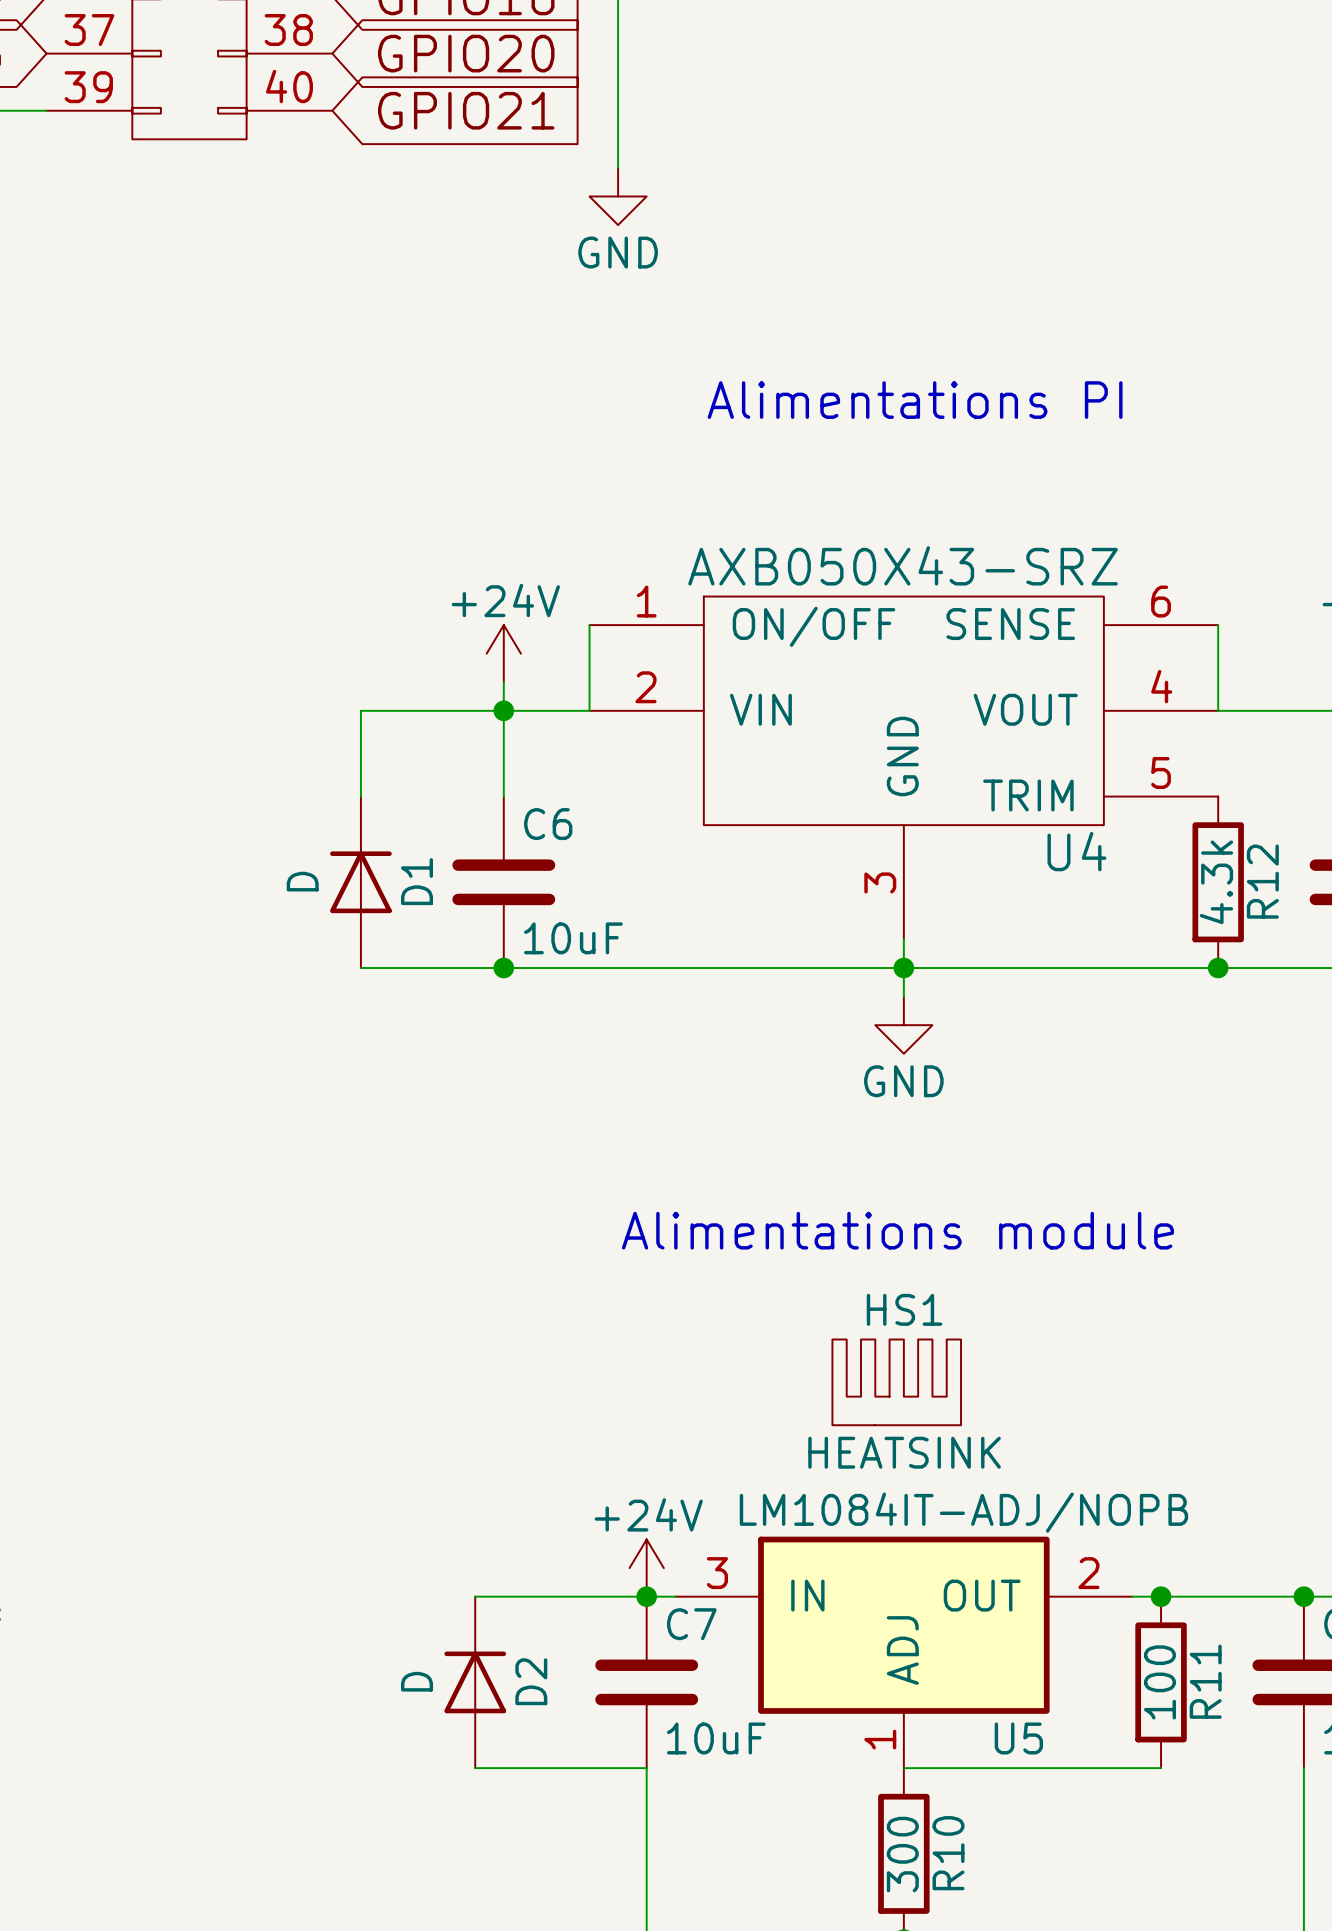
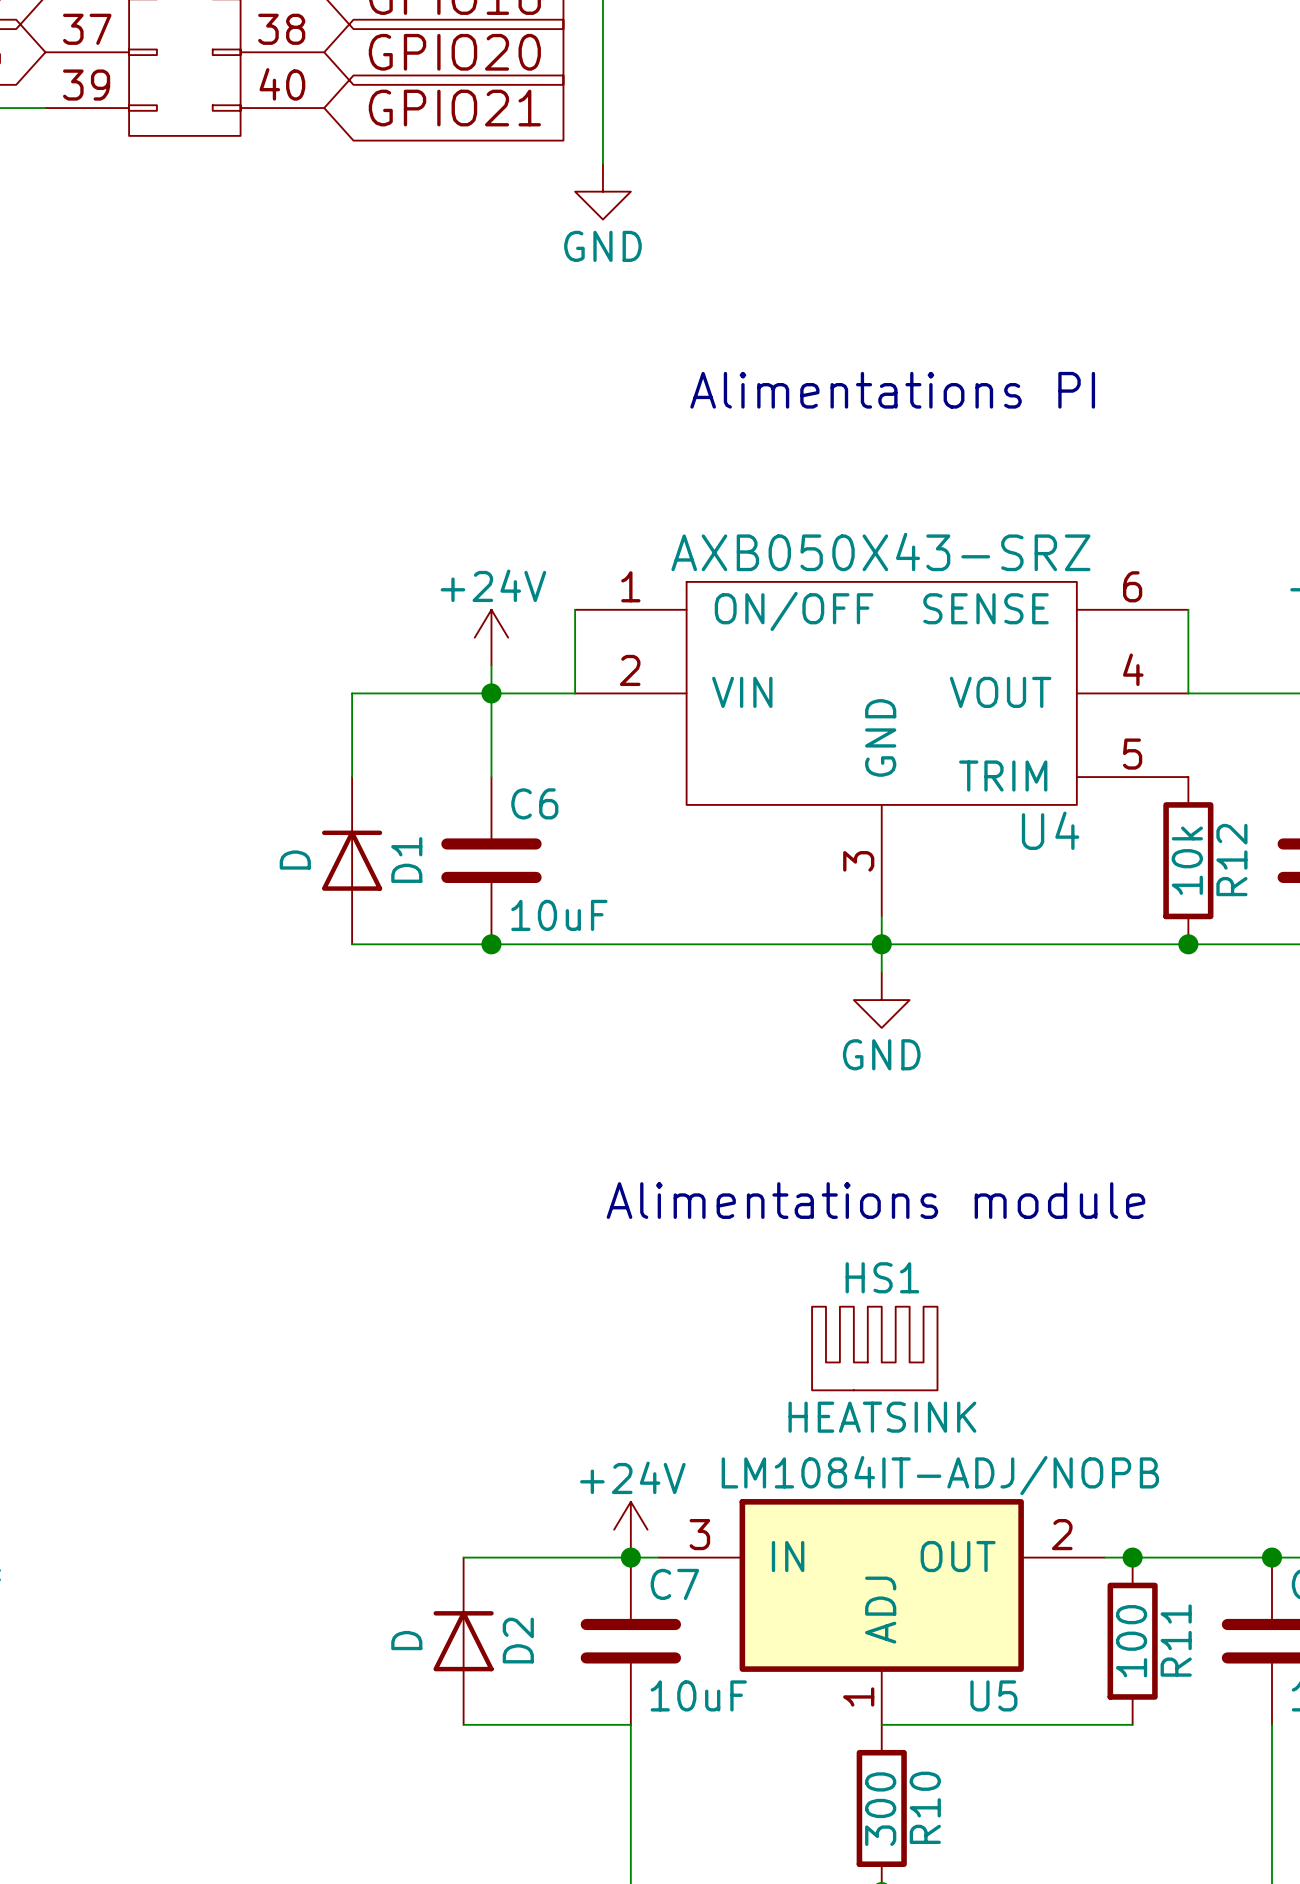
R12 value: 4.3k (1216, 882) -> 10k (1187, 860)

